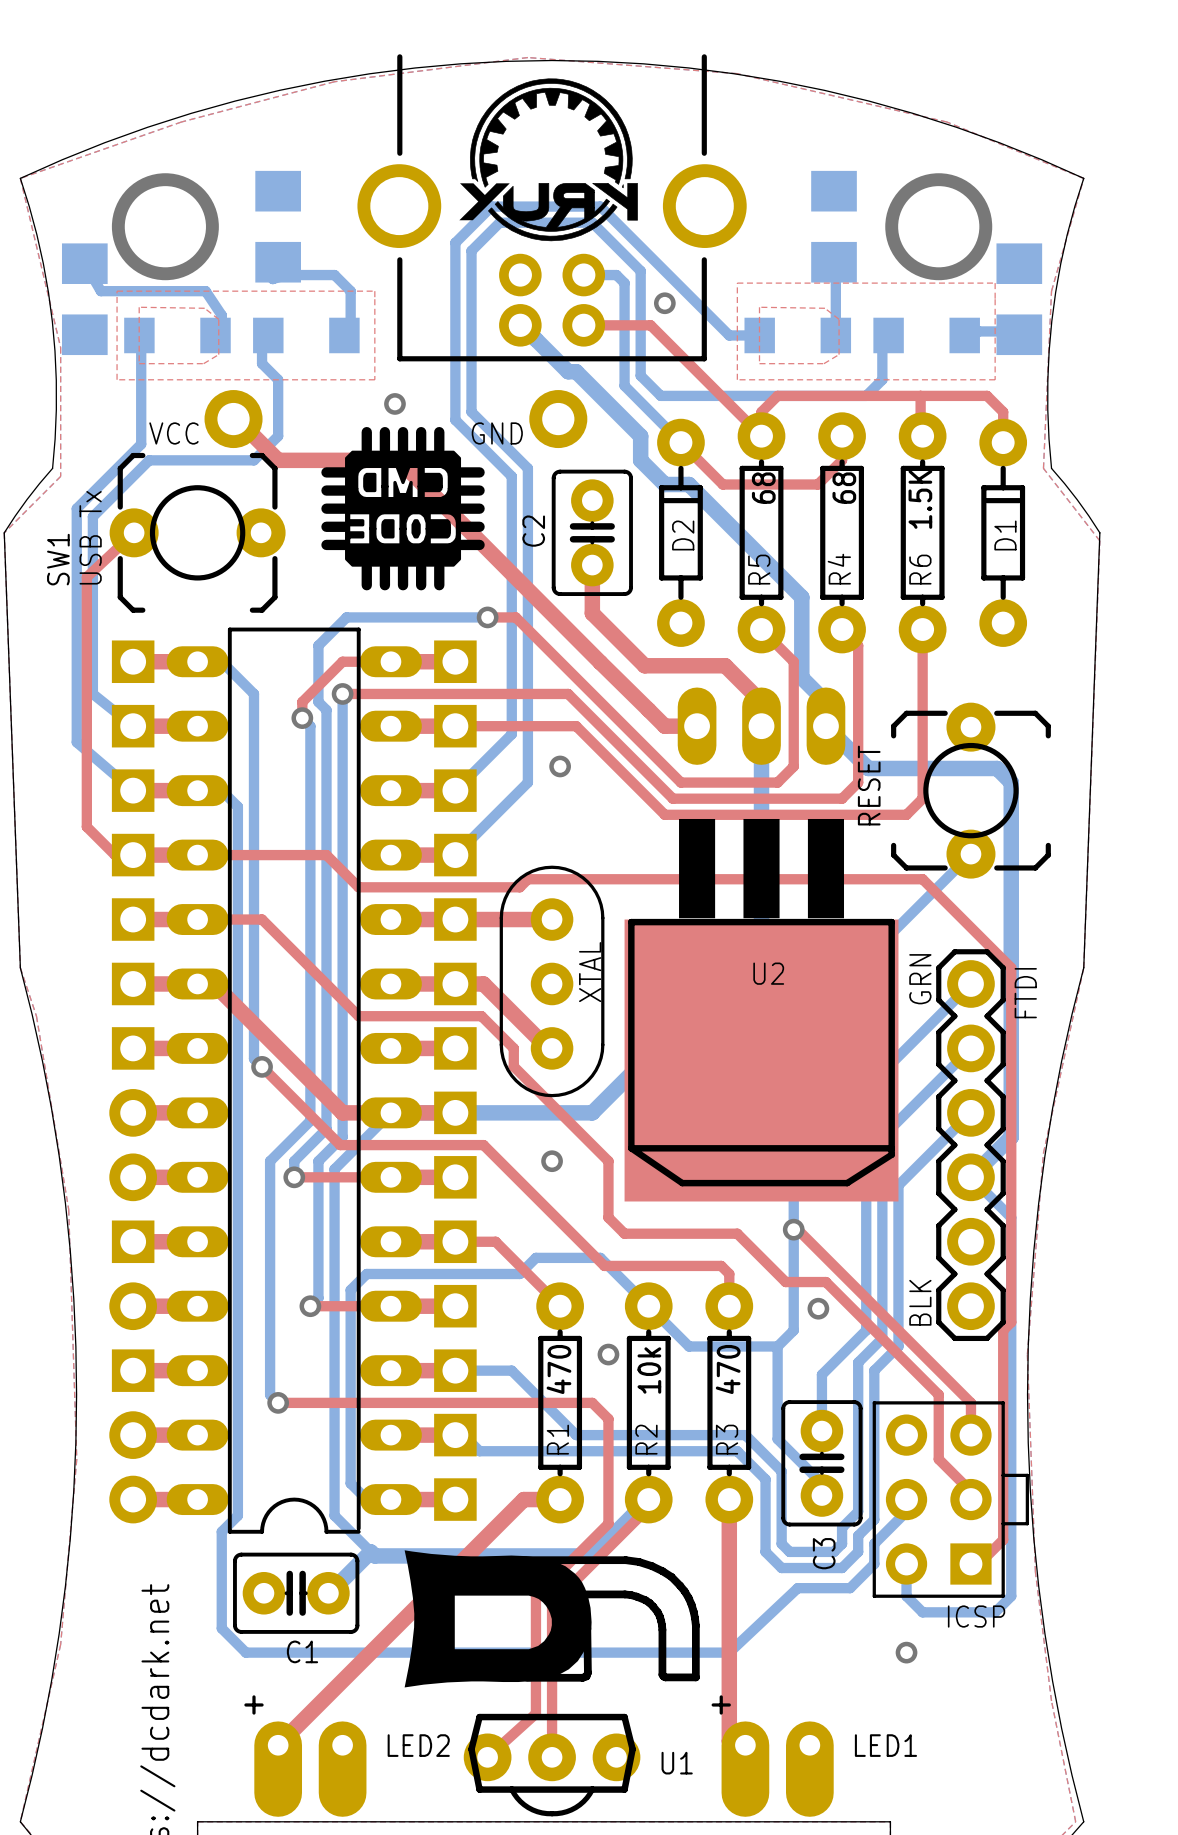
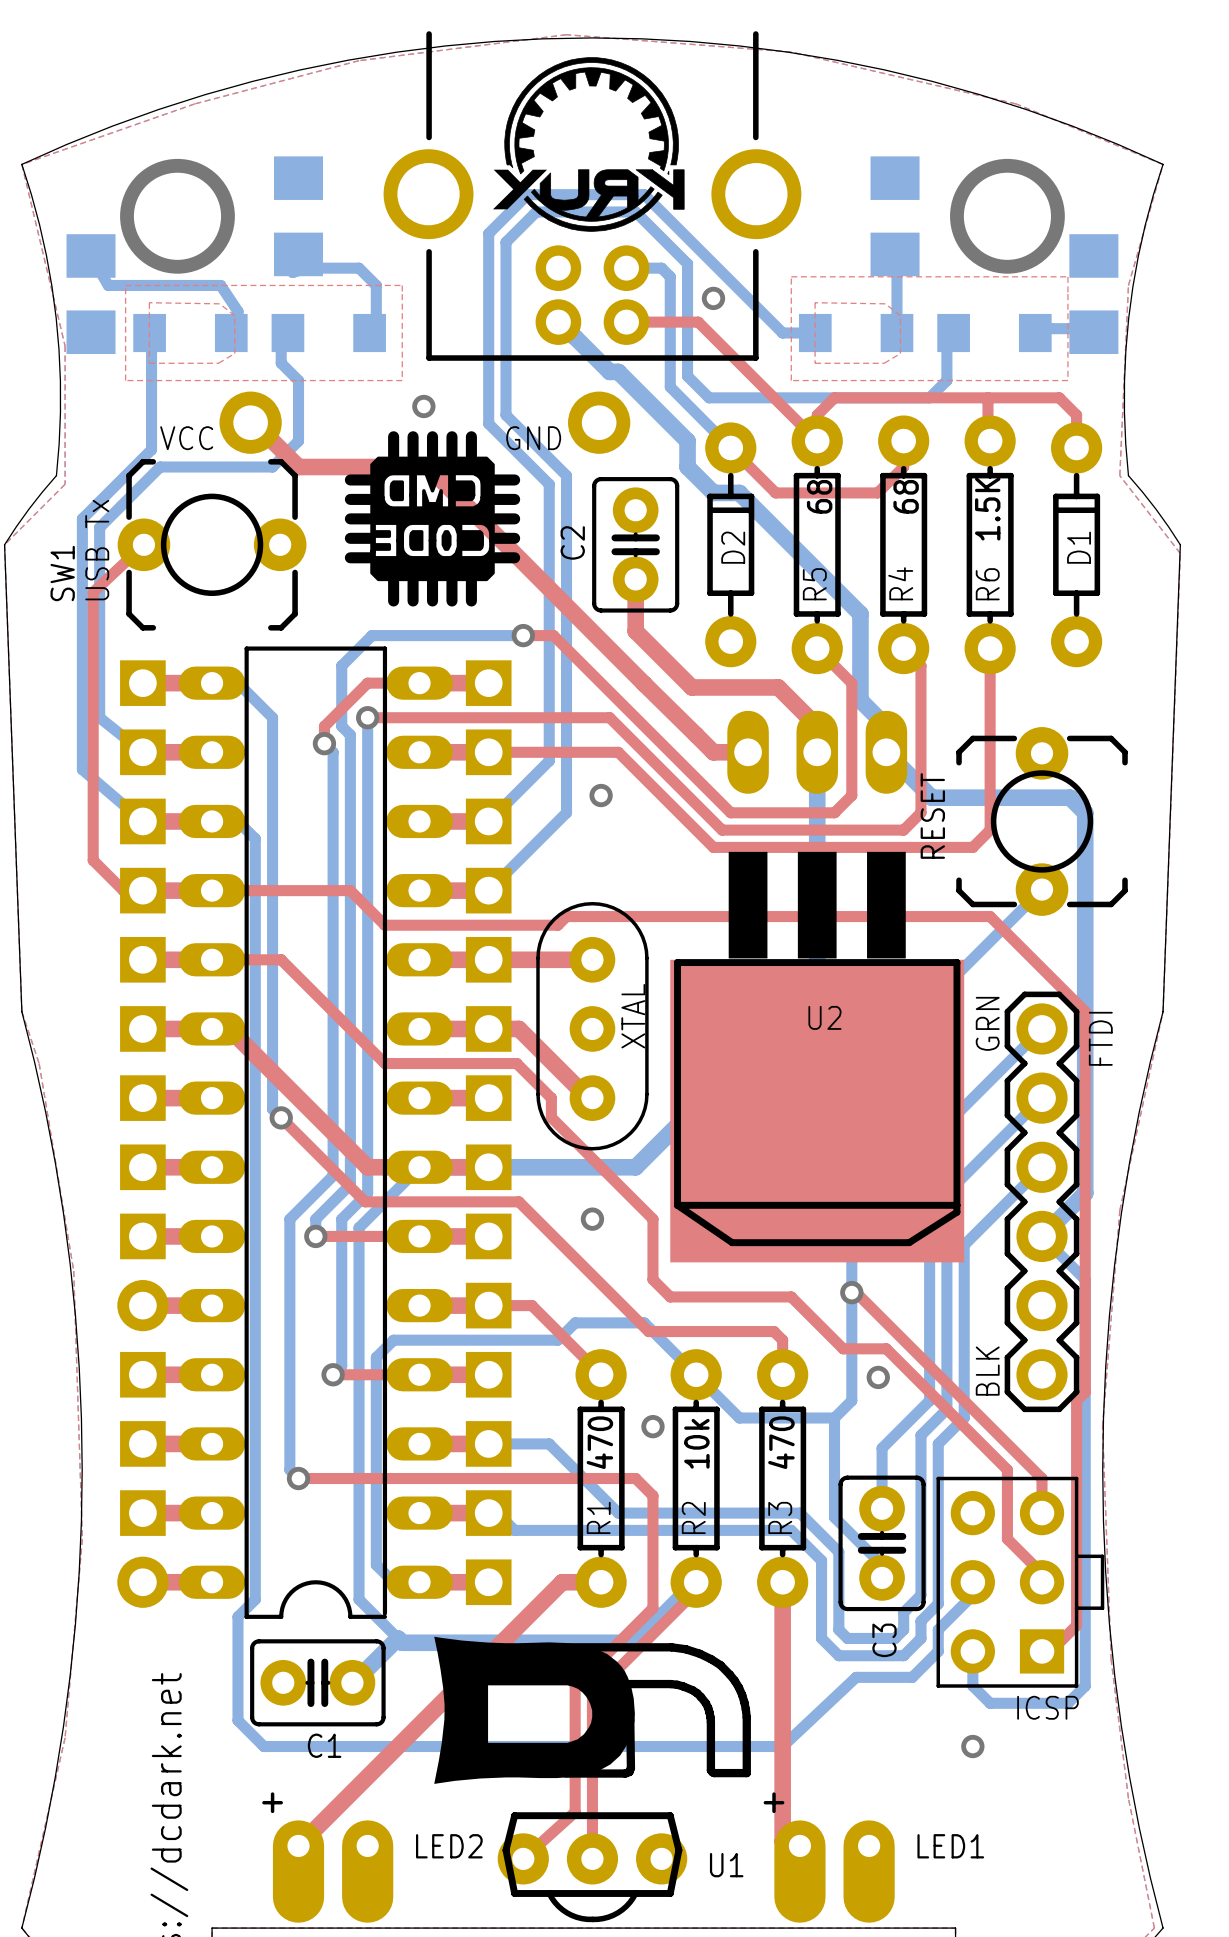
part footprint: [109, 1089, 158, 1137] -> [120, 1144, 166, 1191]
part footprint: [109, 1153, 158, 1202] -> [120, 1213, 166, 1260]
part footprint: [111, 1220, 155, 1264] -> [117, 1280, 169, 1332]
part footprint: [109, 1282, 158, 1331] -> [120, 1351, 166, 1398]
part footprint: [109, 1411, 158, 1459] -> [120, 1490, 166, 1536]

